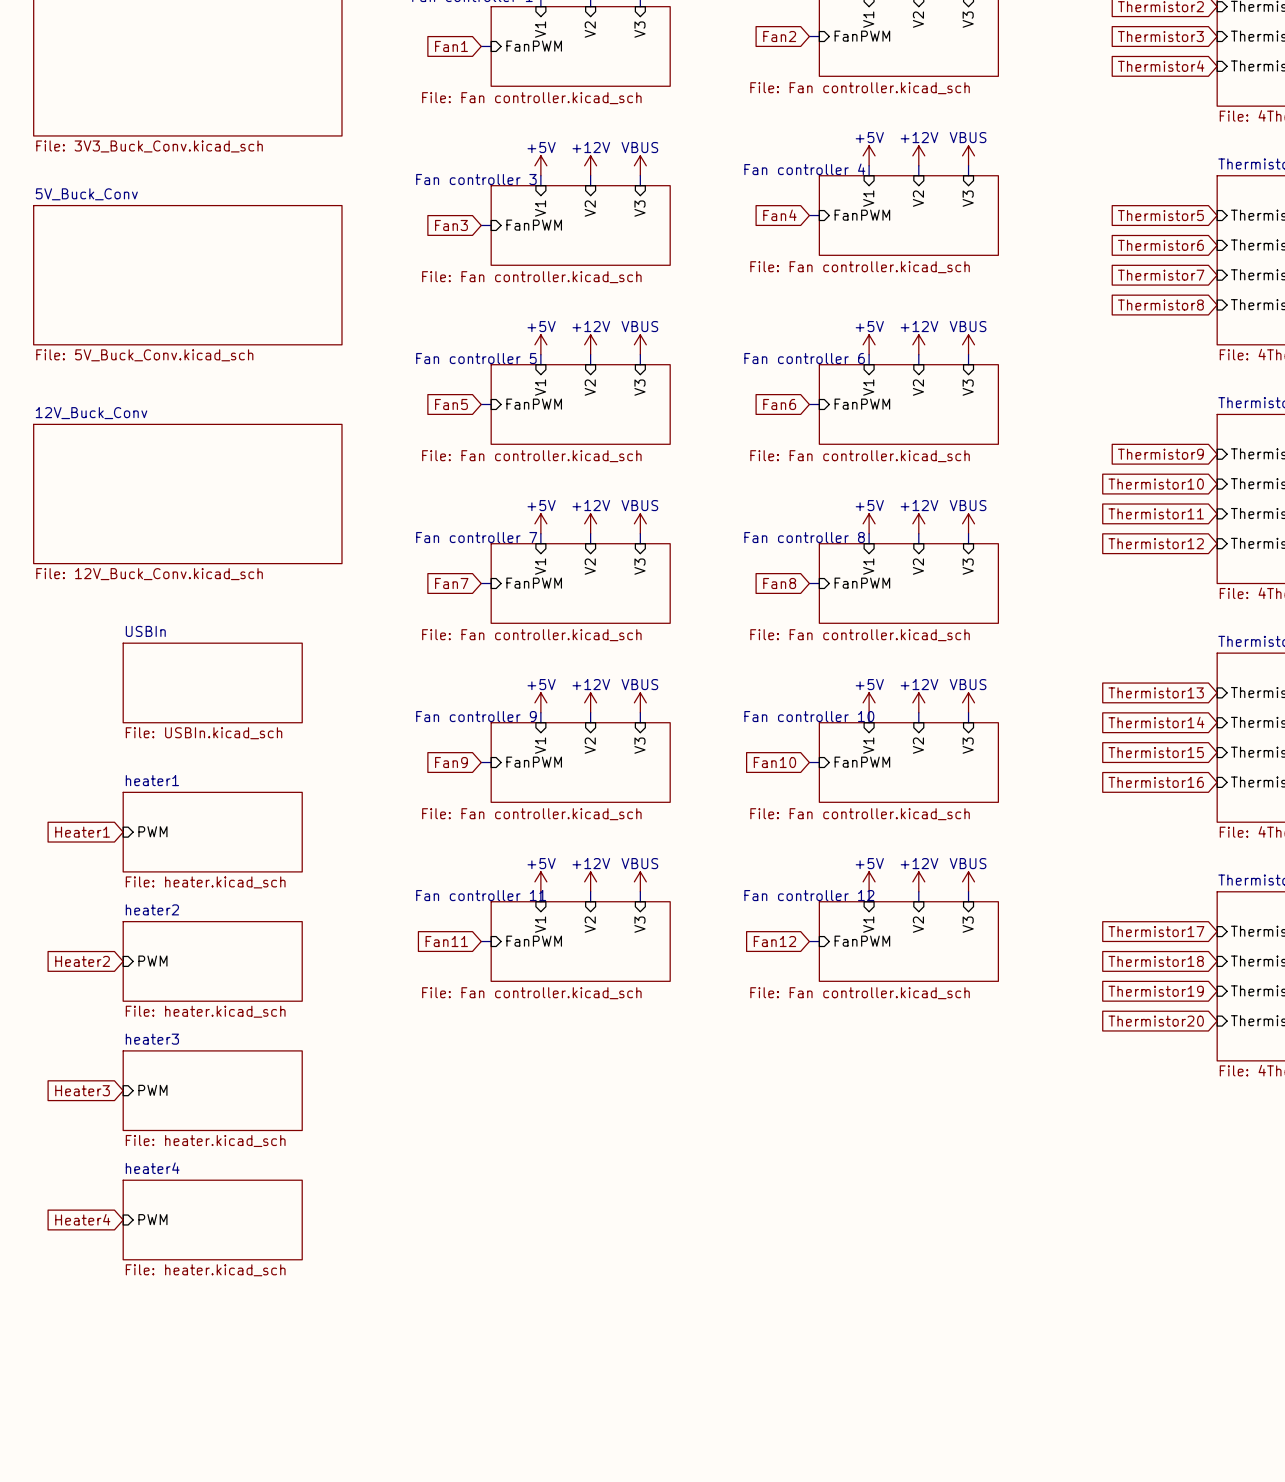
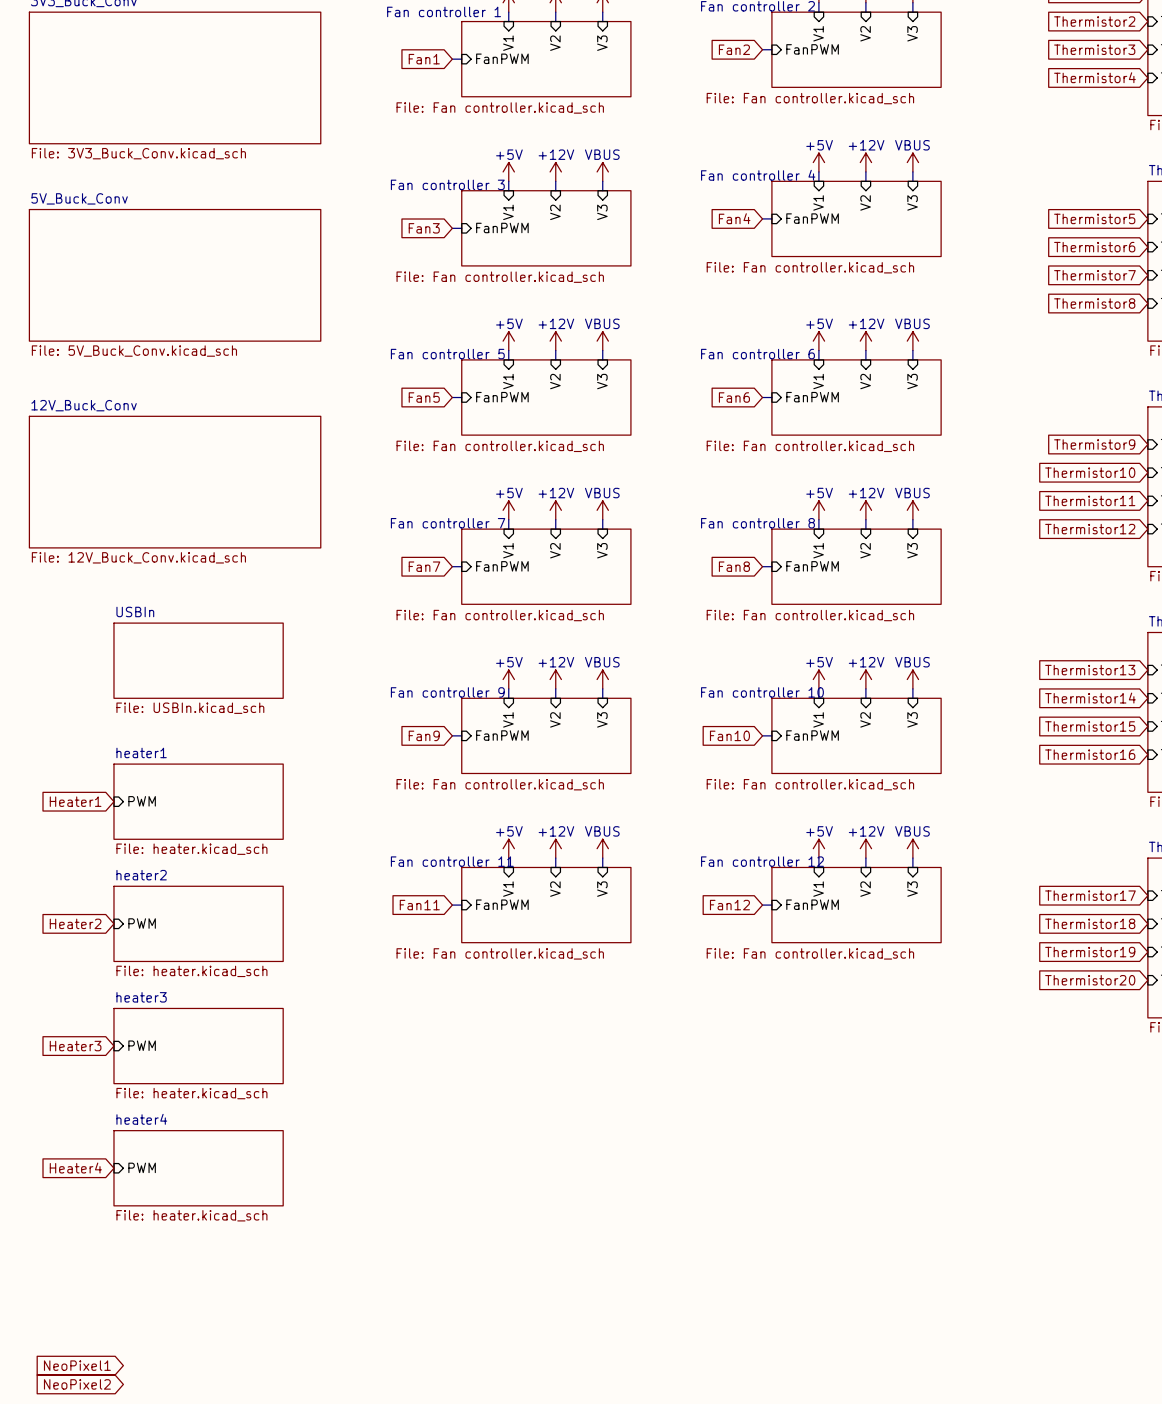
global label: none -> NeoPixel1 (77, 1365)
global label: none -> NeoPixel2 (77, 1384)

